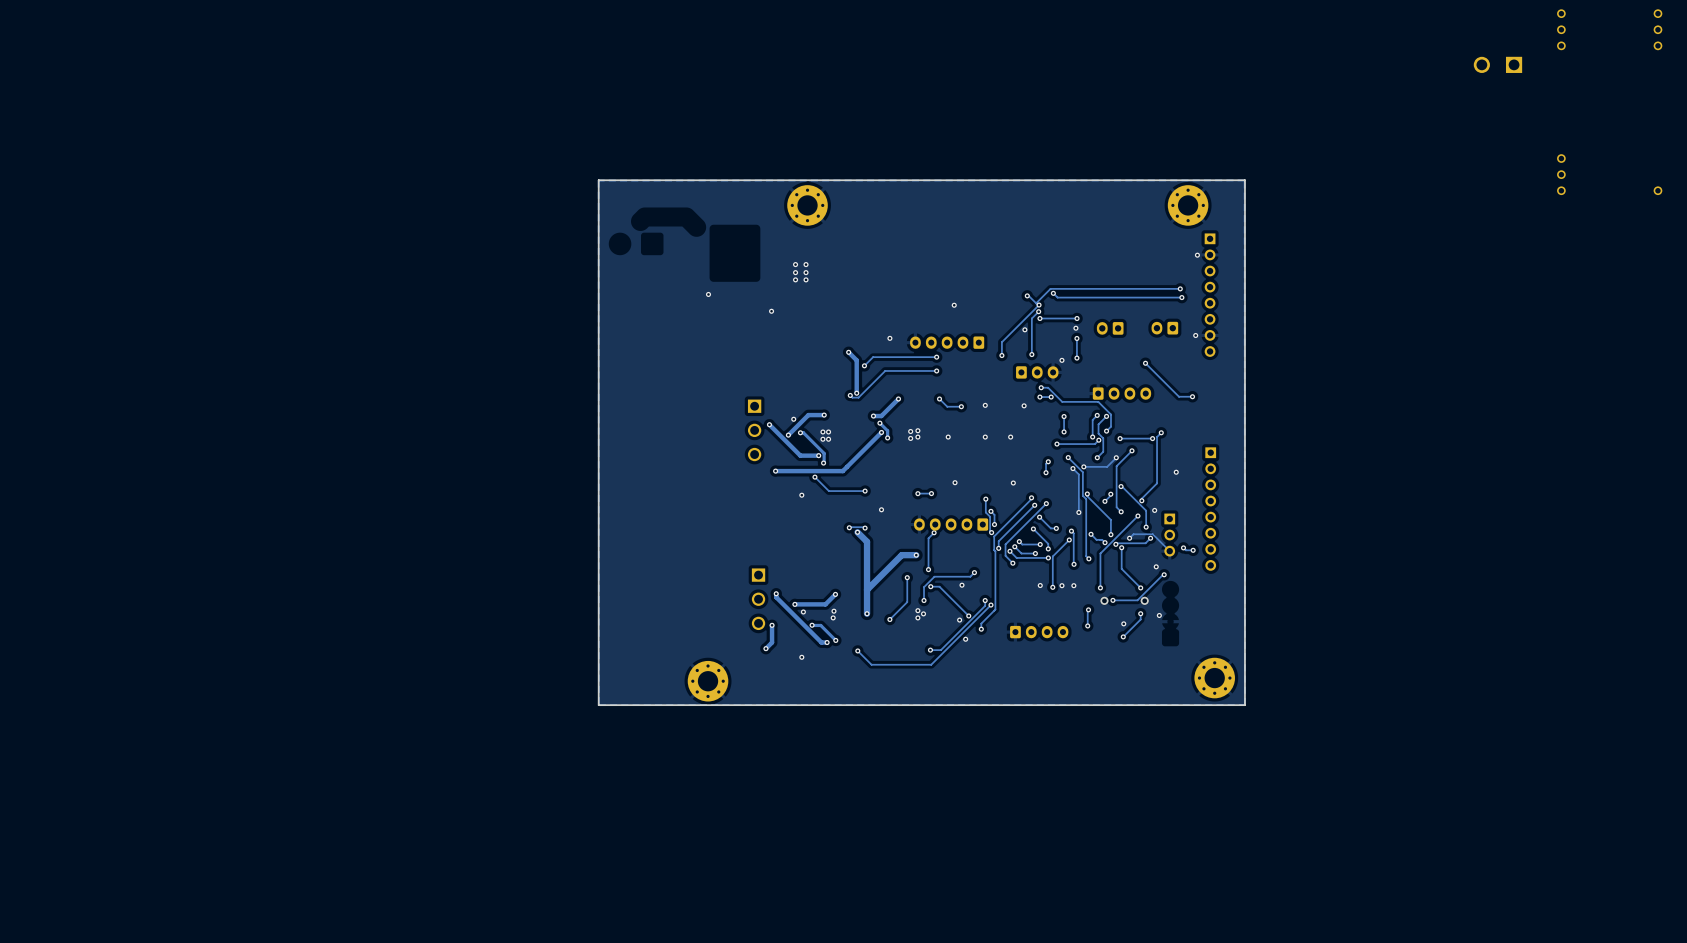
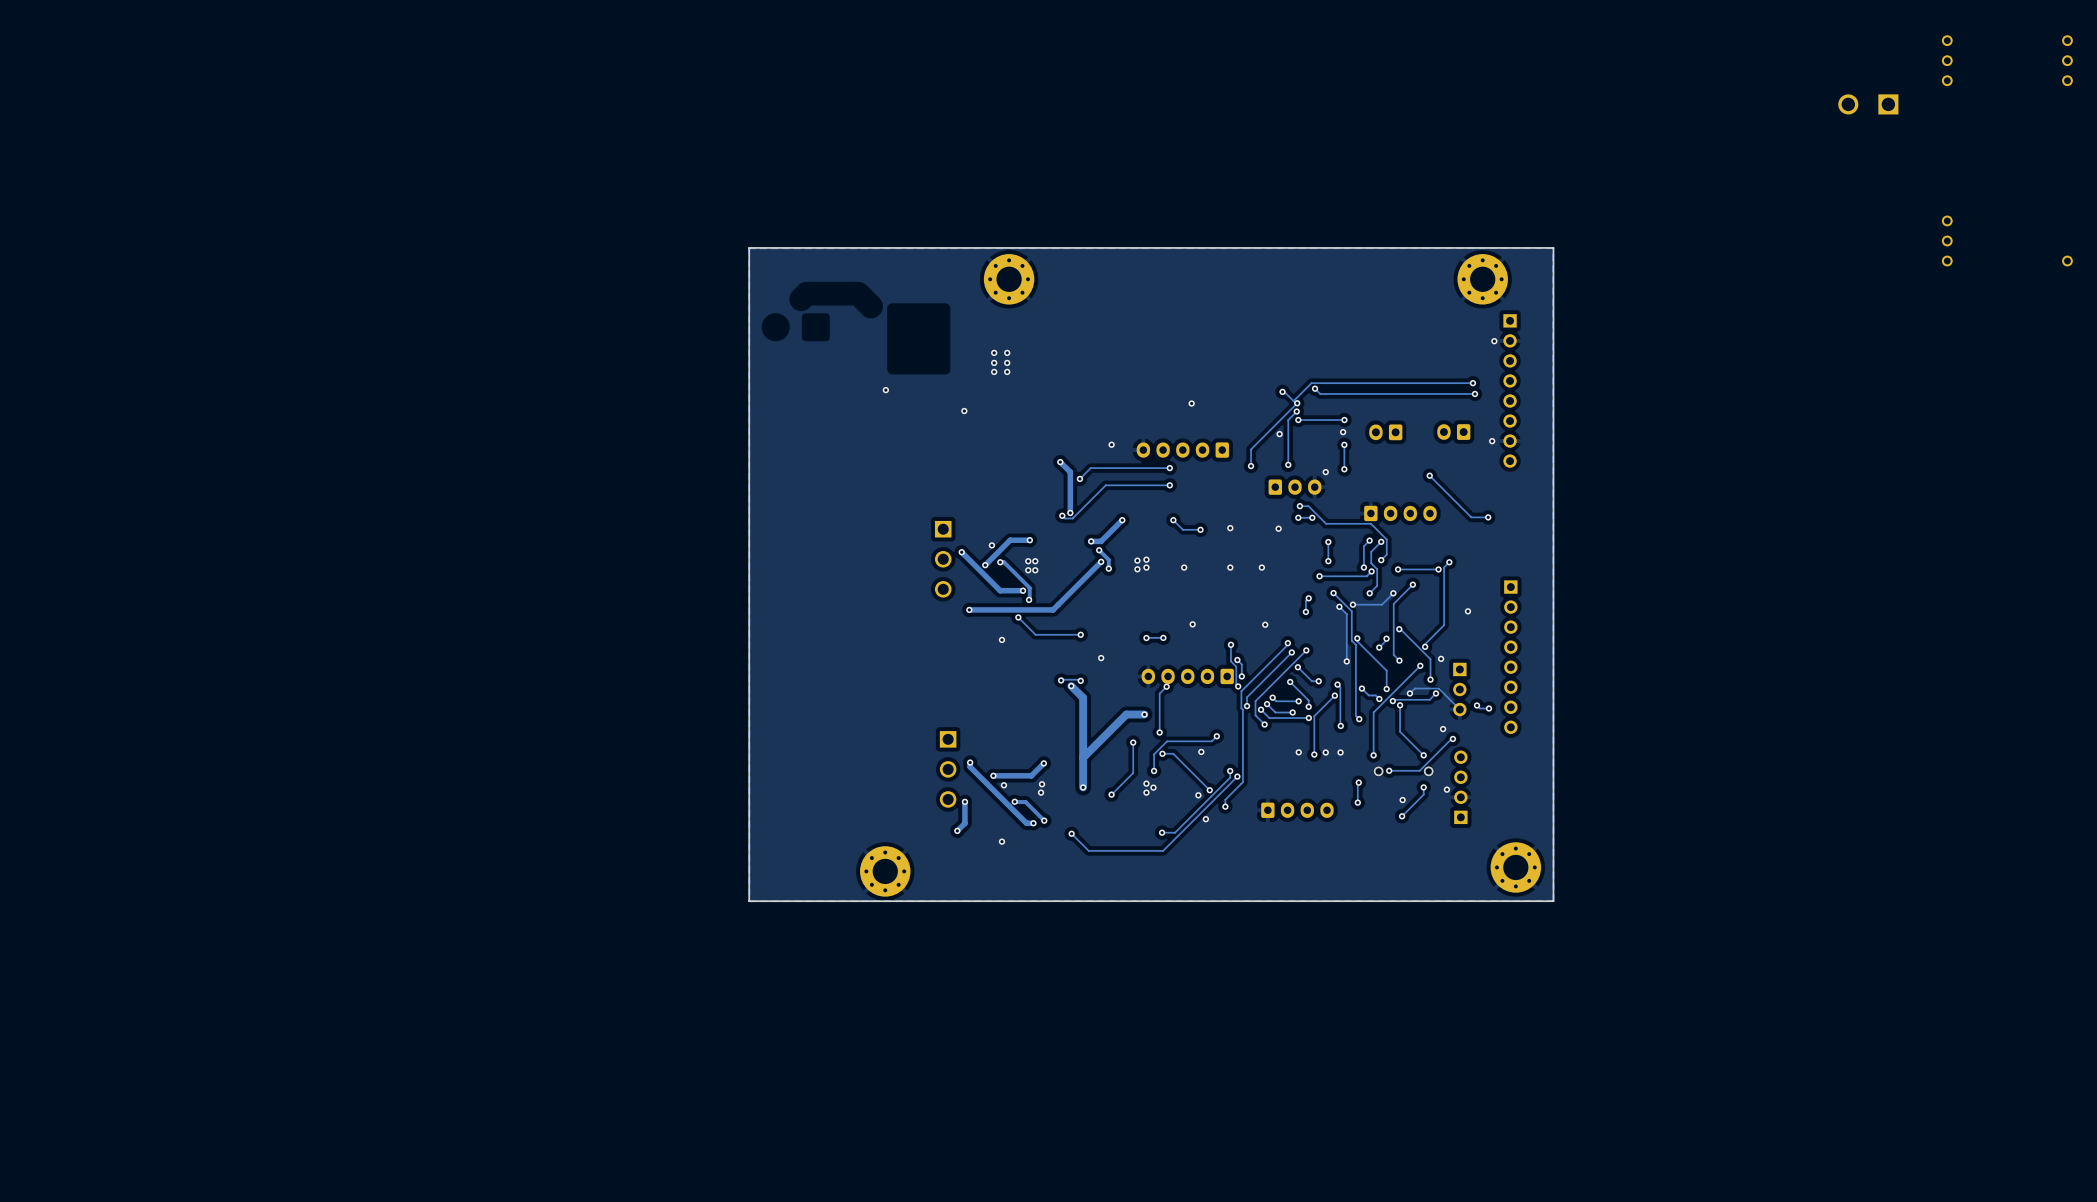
part: none -> (1460, 787)

